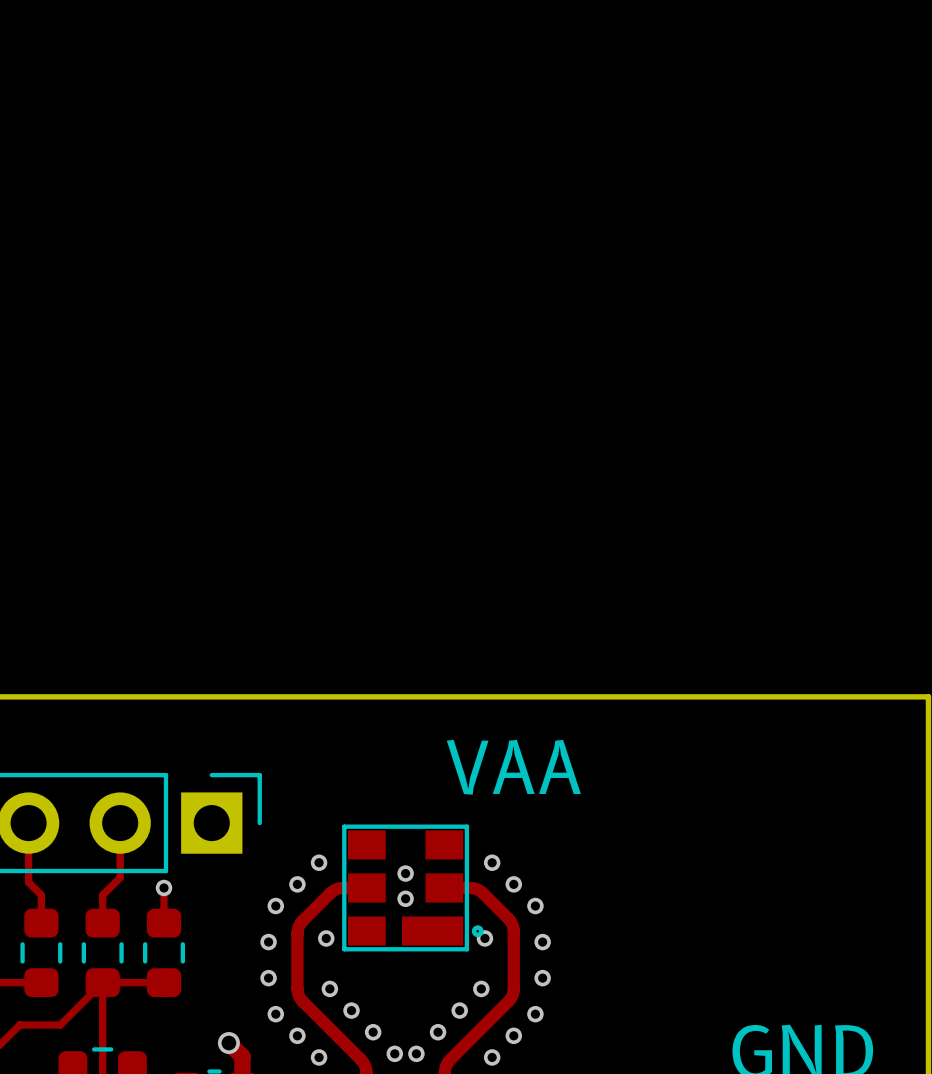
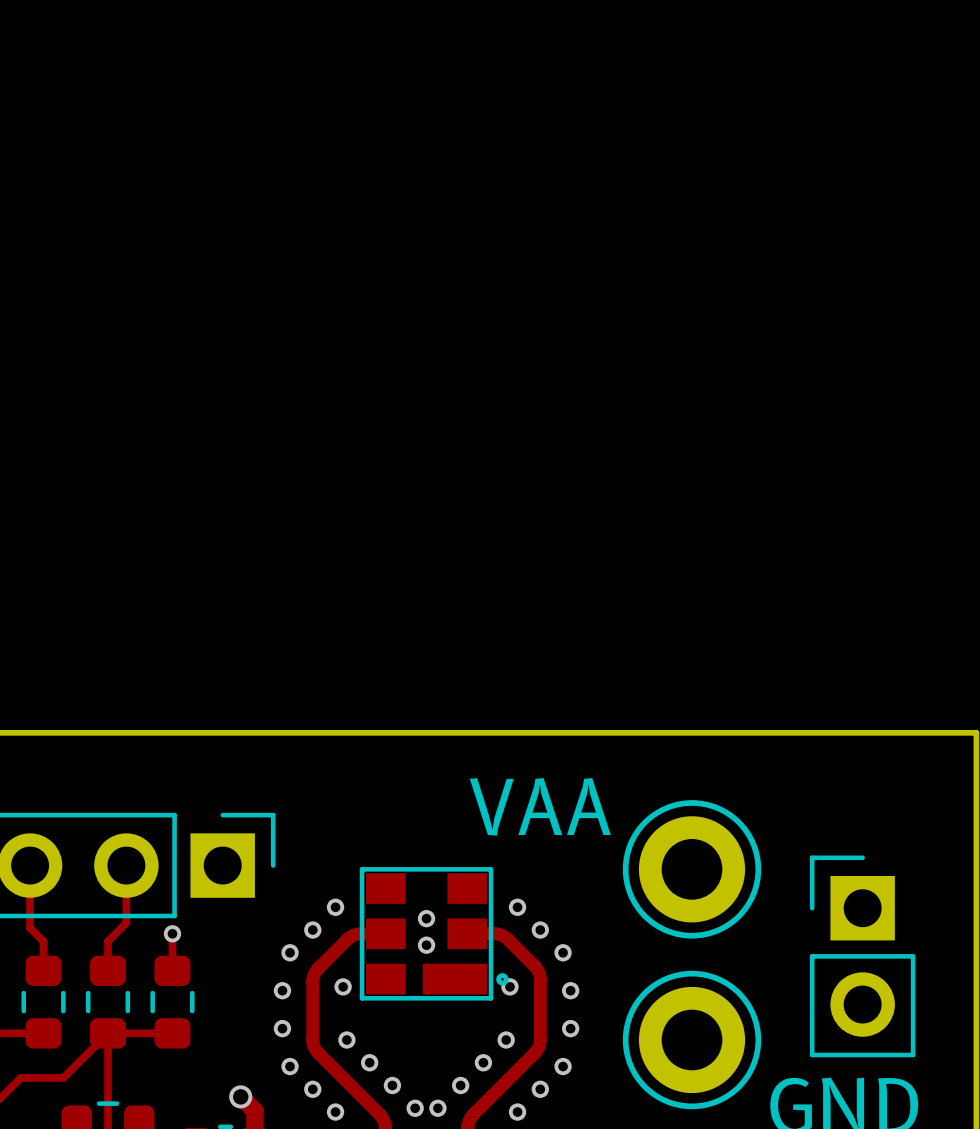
part: none -> (692, 869)
part: none -> (862, 956)
part: none -> (692, 1040)

